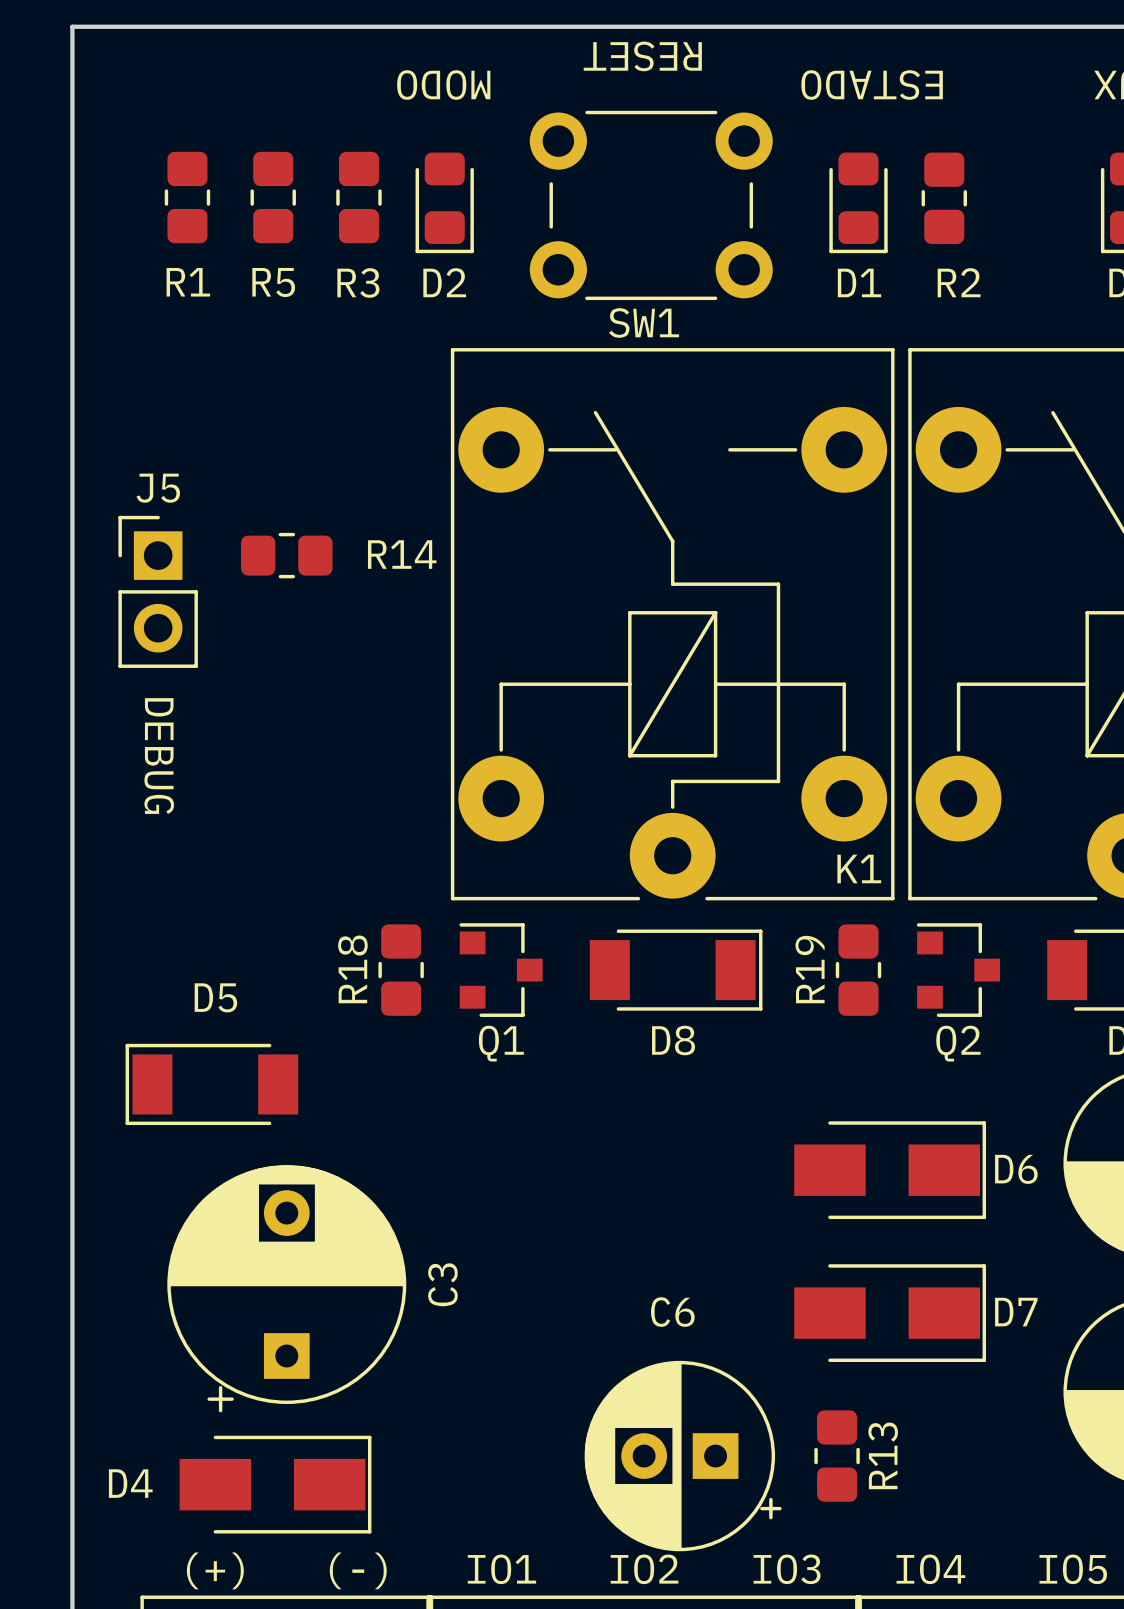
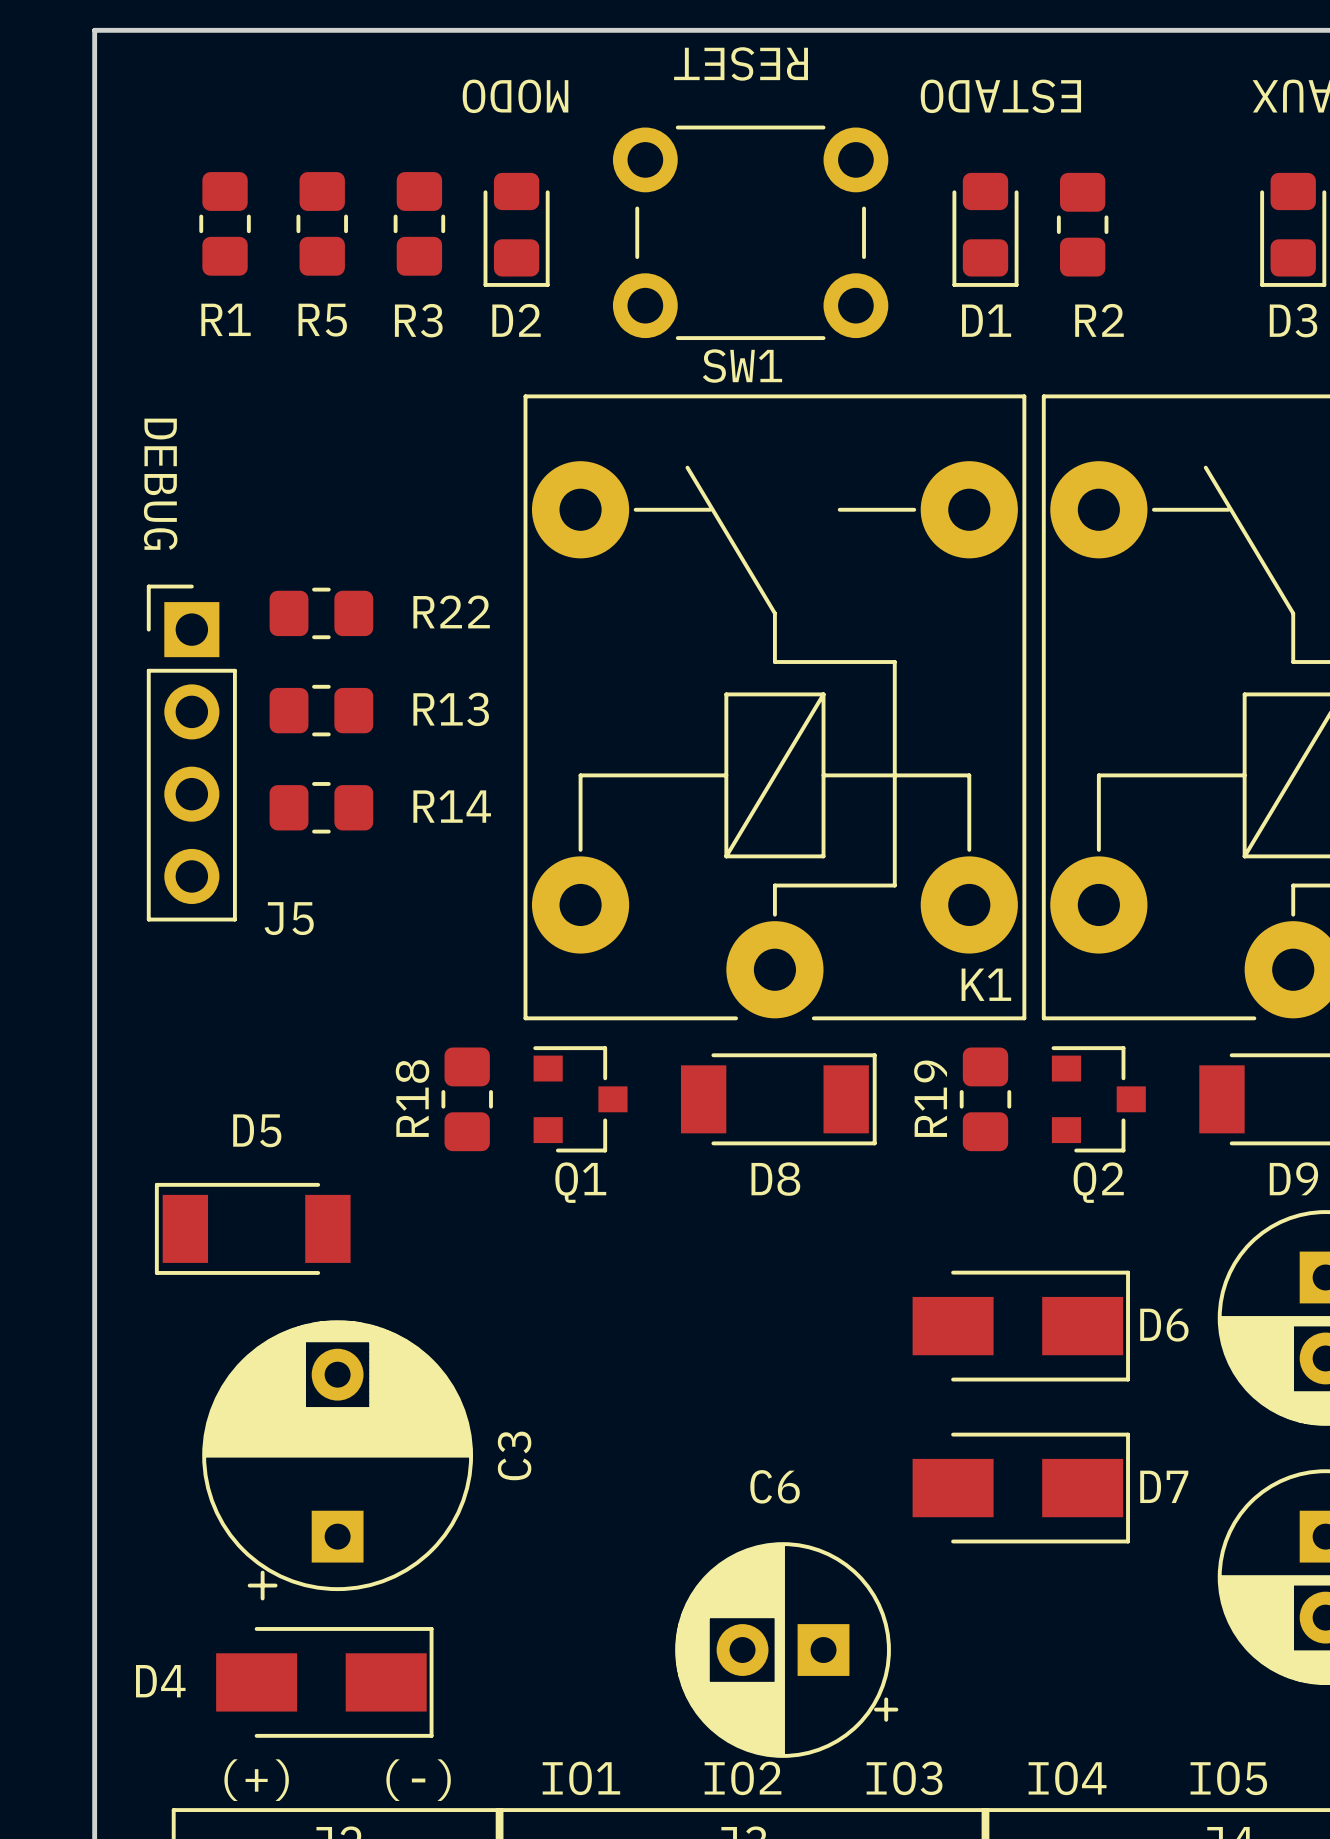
J5 name position: J5 (158, 488) -> J5 (289, 918)
J5 footprint: [118, 515, 198, 668] -> [146, 584, 237, 922]
R22: none -> (321, 613)
R14 position: (286, 555) -> (321, 807)
text position: DEBUG (159, 756) -> DEBUG (160, 484)
R13 name position: R13 (883, 1455) -> R13 (451, 709)
R13 rotation: 0° (837, 1456) -> 90° clockwise (321, 710)
R13 position: (837, 1456) -> (321, 710)

